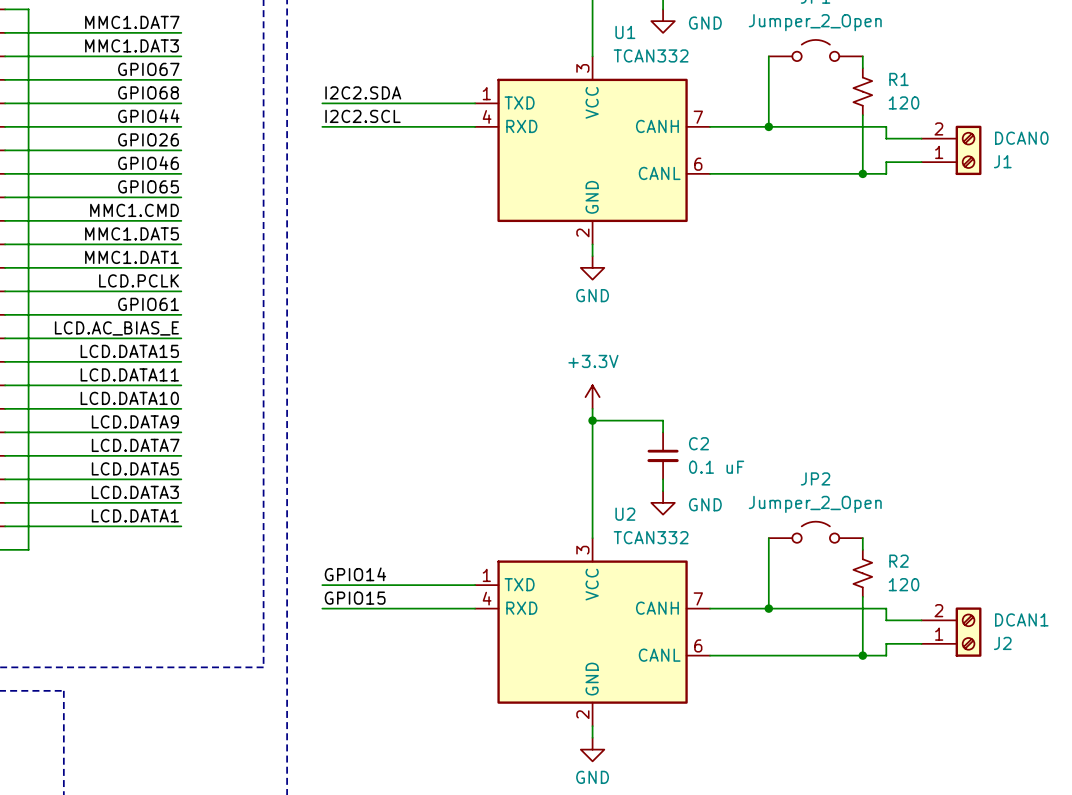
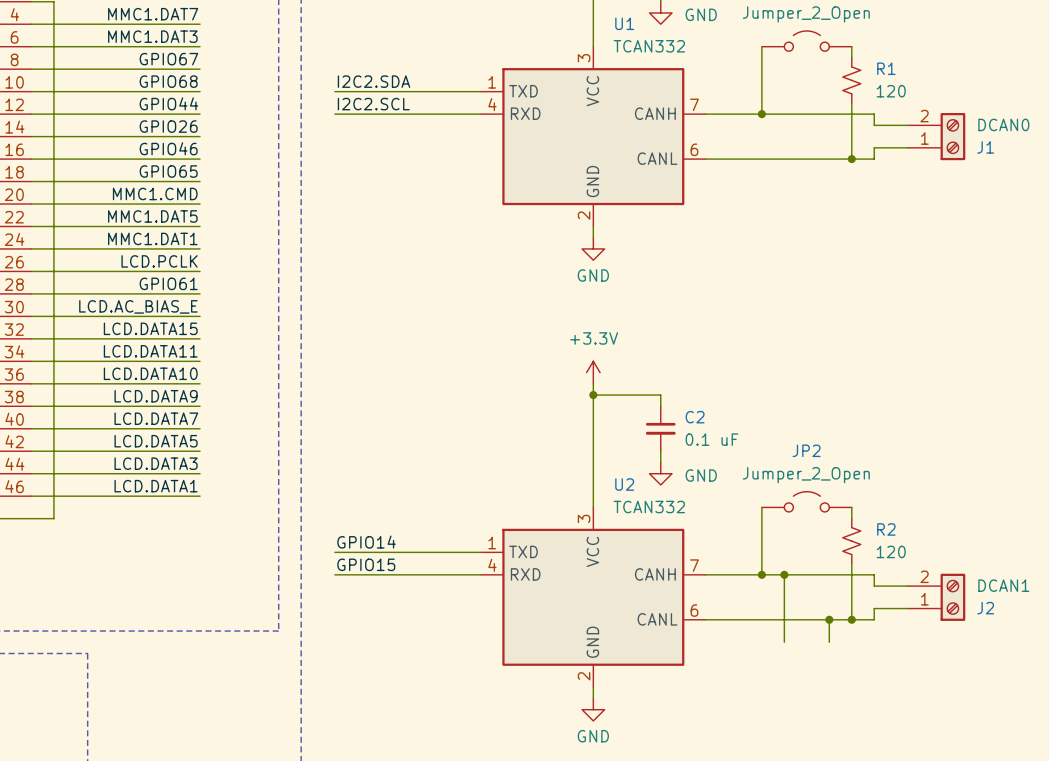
wire: none -> (784, 574) (784, 642)
junction: none -> (784, 574)
wire: none -> (829, 619) (829, 642)
junction: none -> (829, 619)

